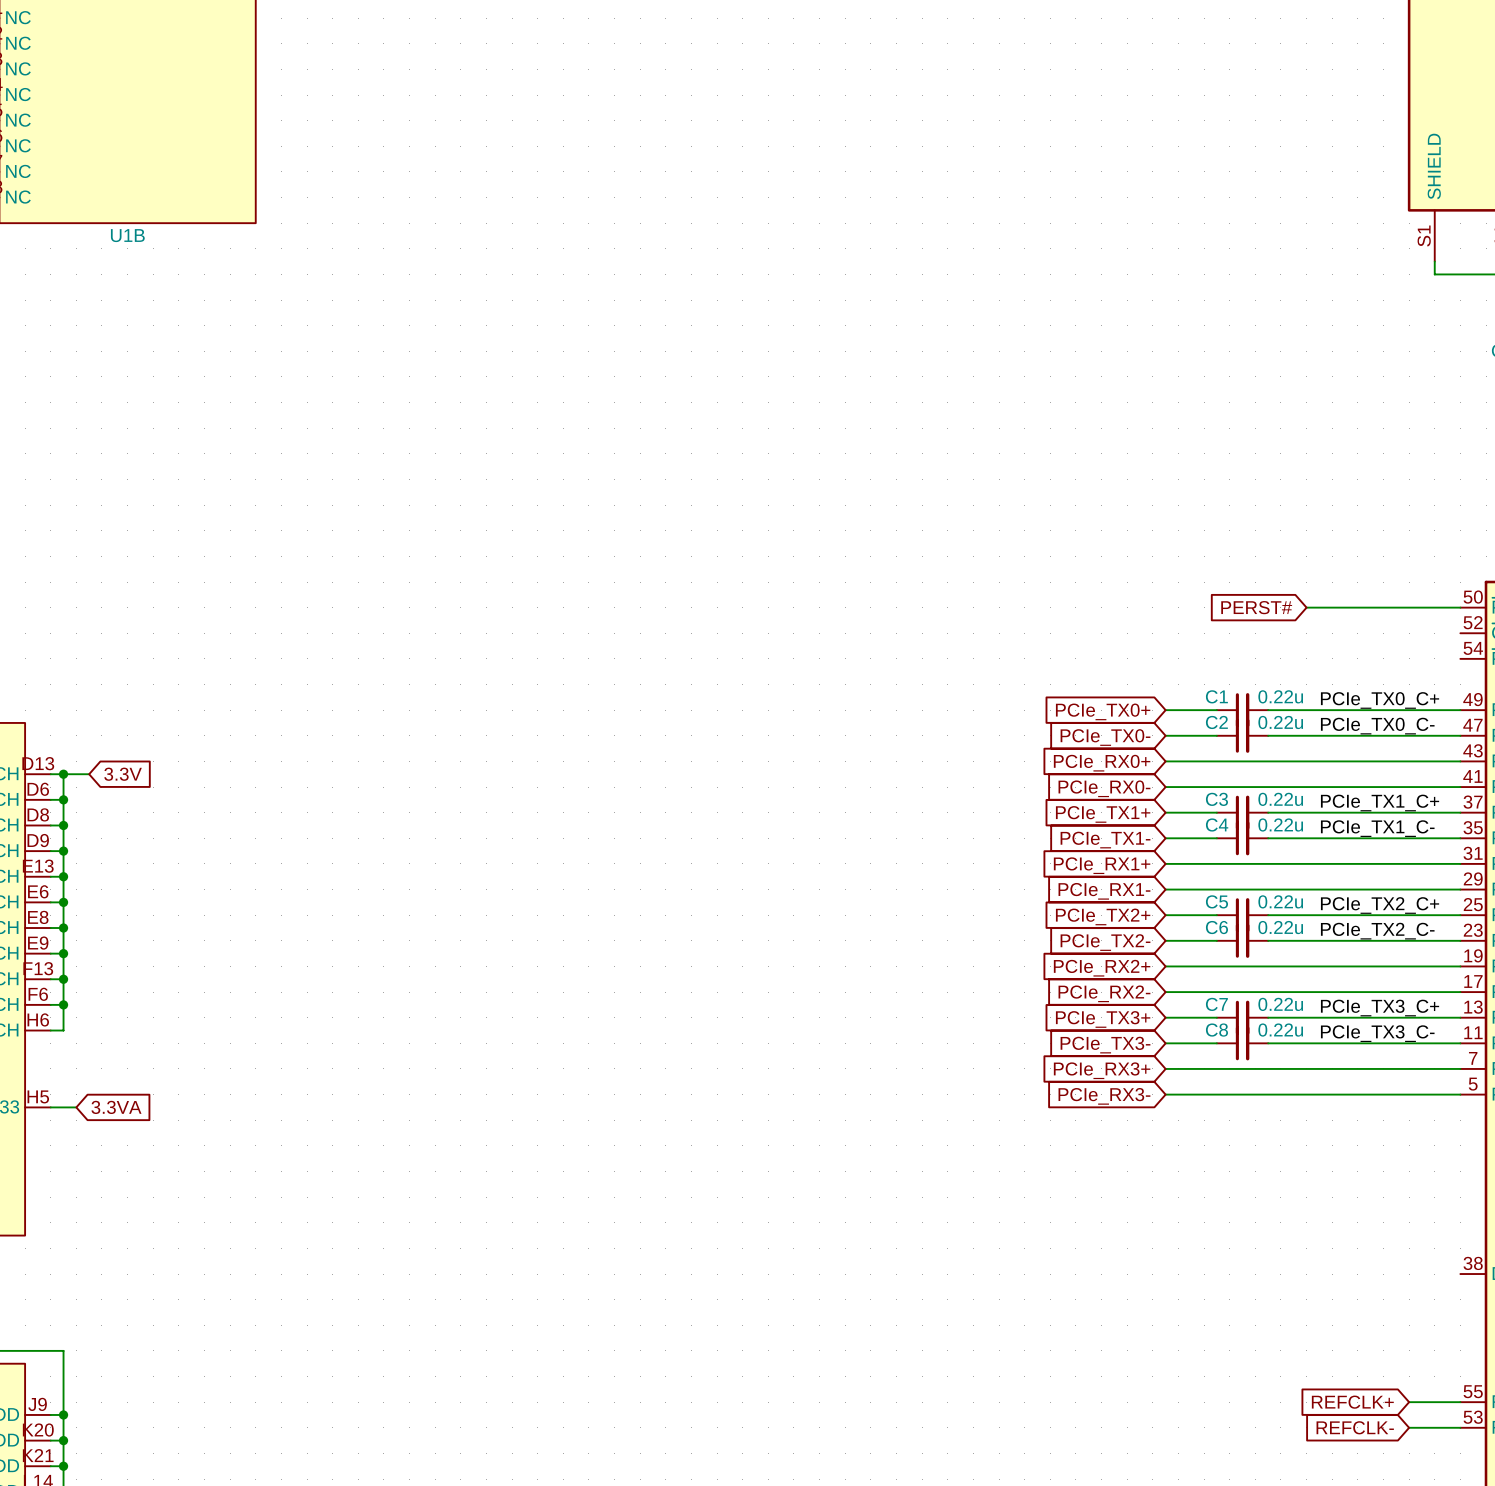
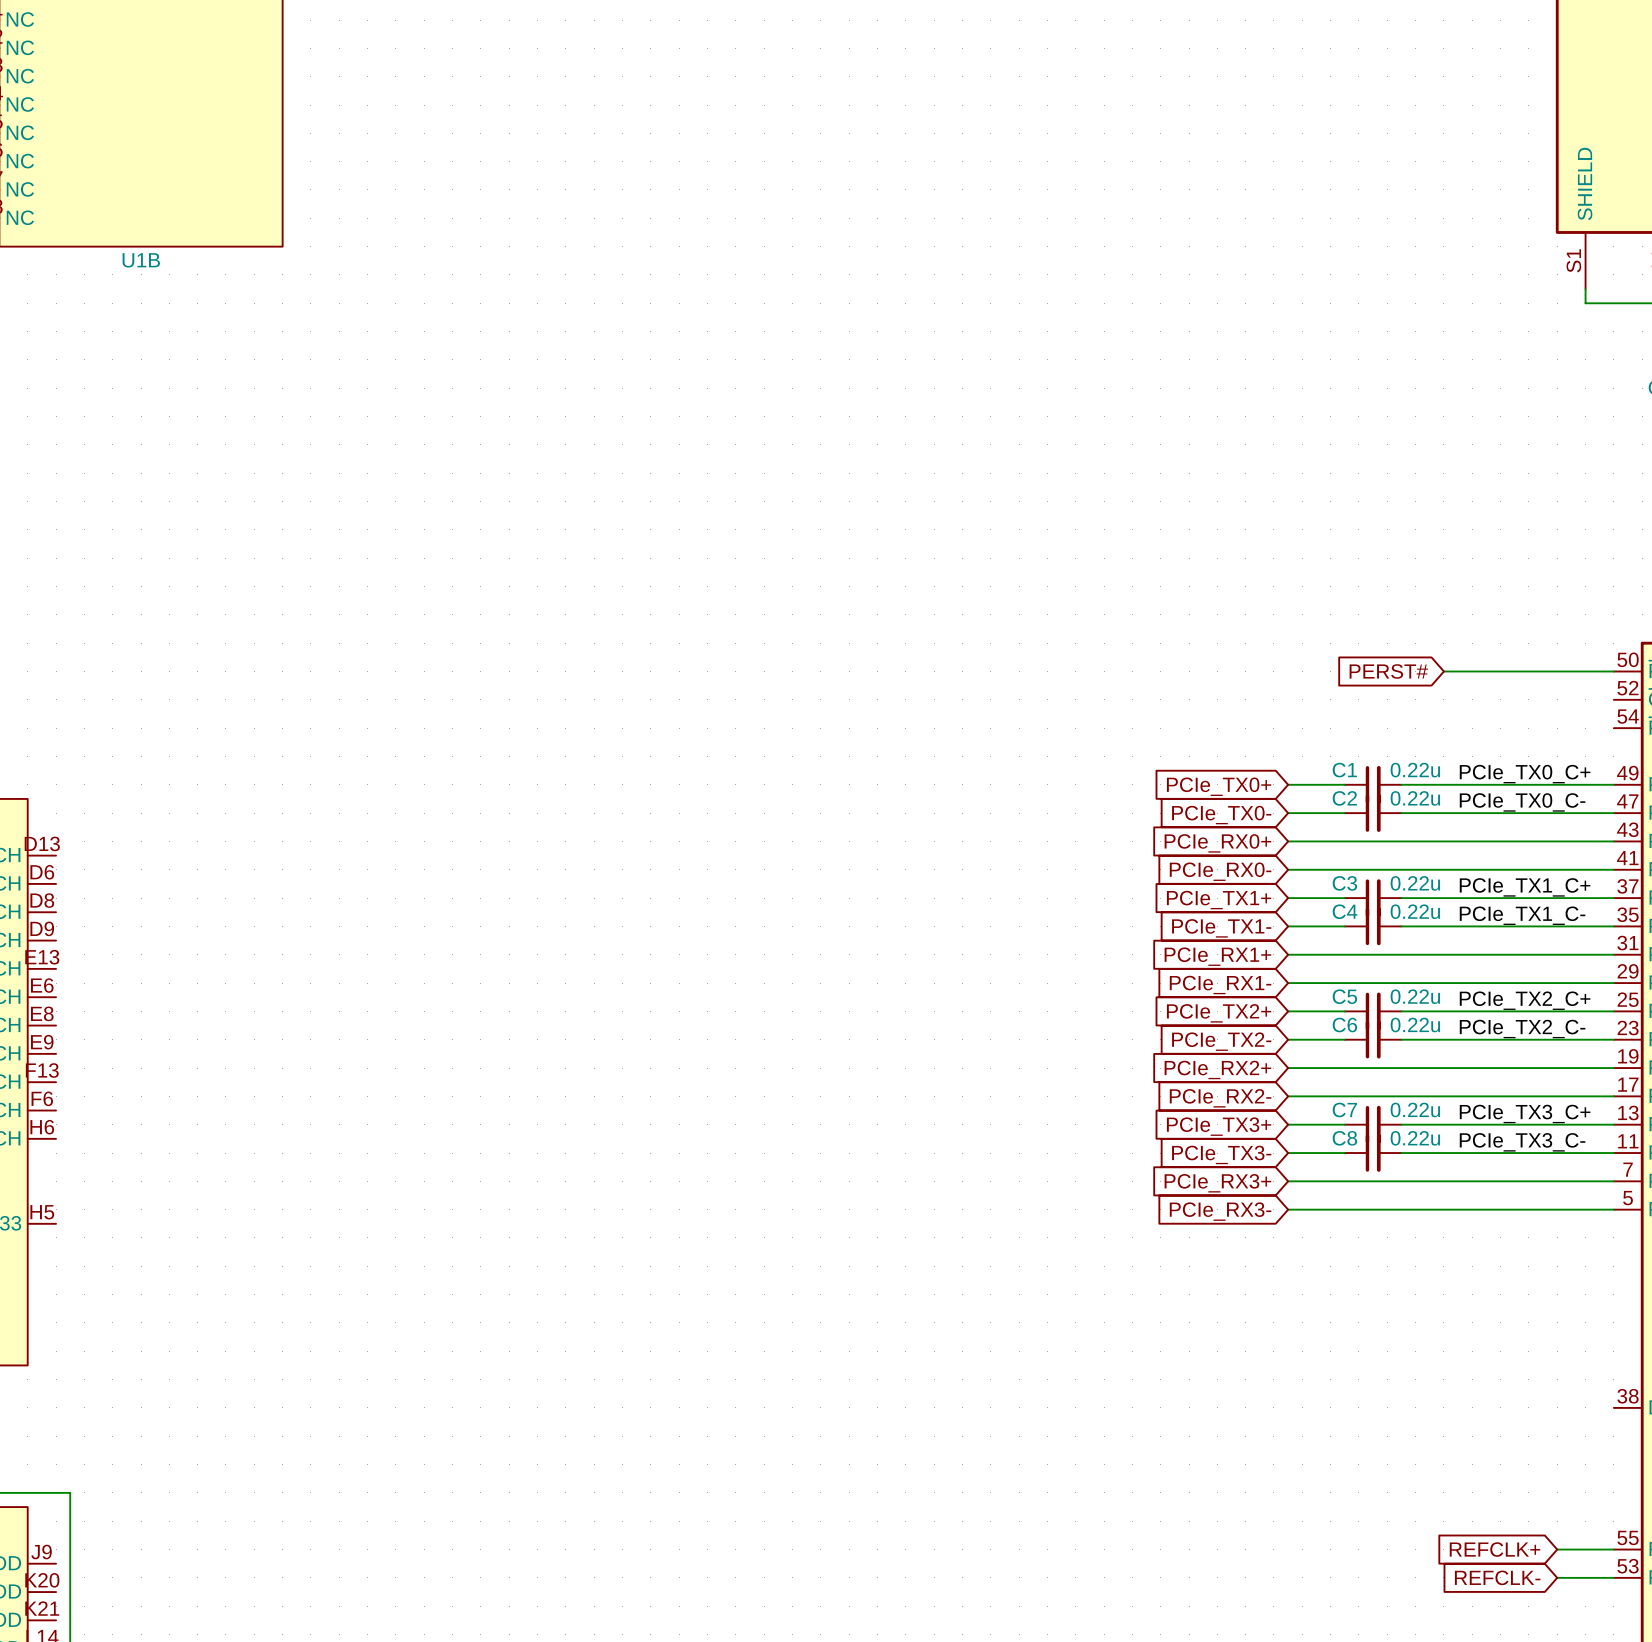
wire: (50, 774) (89, 774) -> none
wire: (63, 774) (63, 1030) (50, 1030) -> none
junction: (63, 774) -> none
global label: 3.3V (123, 774) -> none
wire: (50, 799) (63, 799) -> none
junction: (63, 799) -> none
wire: (50, 825) (63, 825) -> none
junction: (63, 825) -> none
wire: (50, 851) (63, 851) -> none
junction: (63, 851) -> none
wire: (50, 876) (63, 876) -> none
junction: (63, 876) -> none
wire: (50, 902) (63, 902) -> none
junction: (63, 902) -> none
wire: (50, 928) (63, 928) -> none
junction: (63, 928) -> none
wire: (50, 953) (63, 953) -> none
junction: (63, 953) -> none
wire: (50, 979) (63, 979) -> none
junction: (63, 979) -> none
wire: (50, 1004) (63, 1004) -> none
junction: (63, 1004) -> none
wire: (50, 1107) (76, 1107) -> none
global label: 3.3VA (116, 1107) -> none
wire: (50, 1414) (63, 1414) -> none
junction: (63, 1414) -> none
wire: (50, 1440) (63, 1440) -> none
junction: (63, 1440) -> none
wire: (50, 1466) (63, 1466) -> none
junction: (63, 1466) -> none

